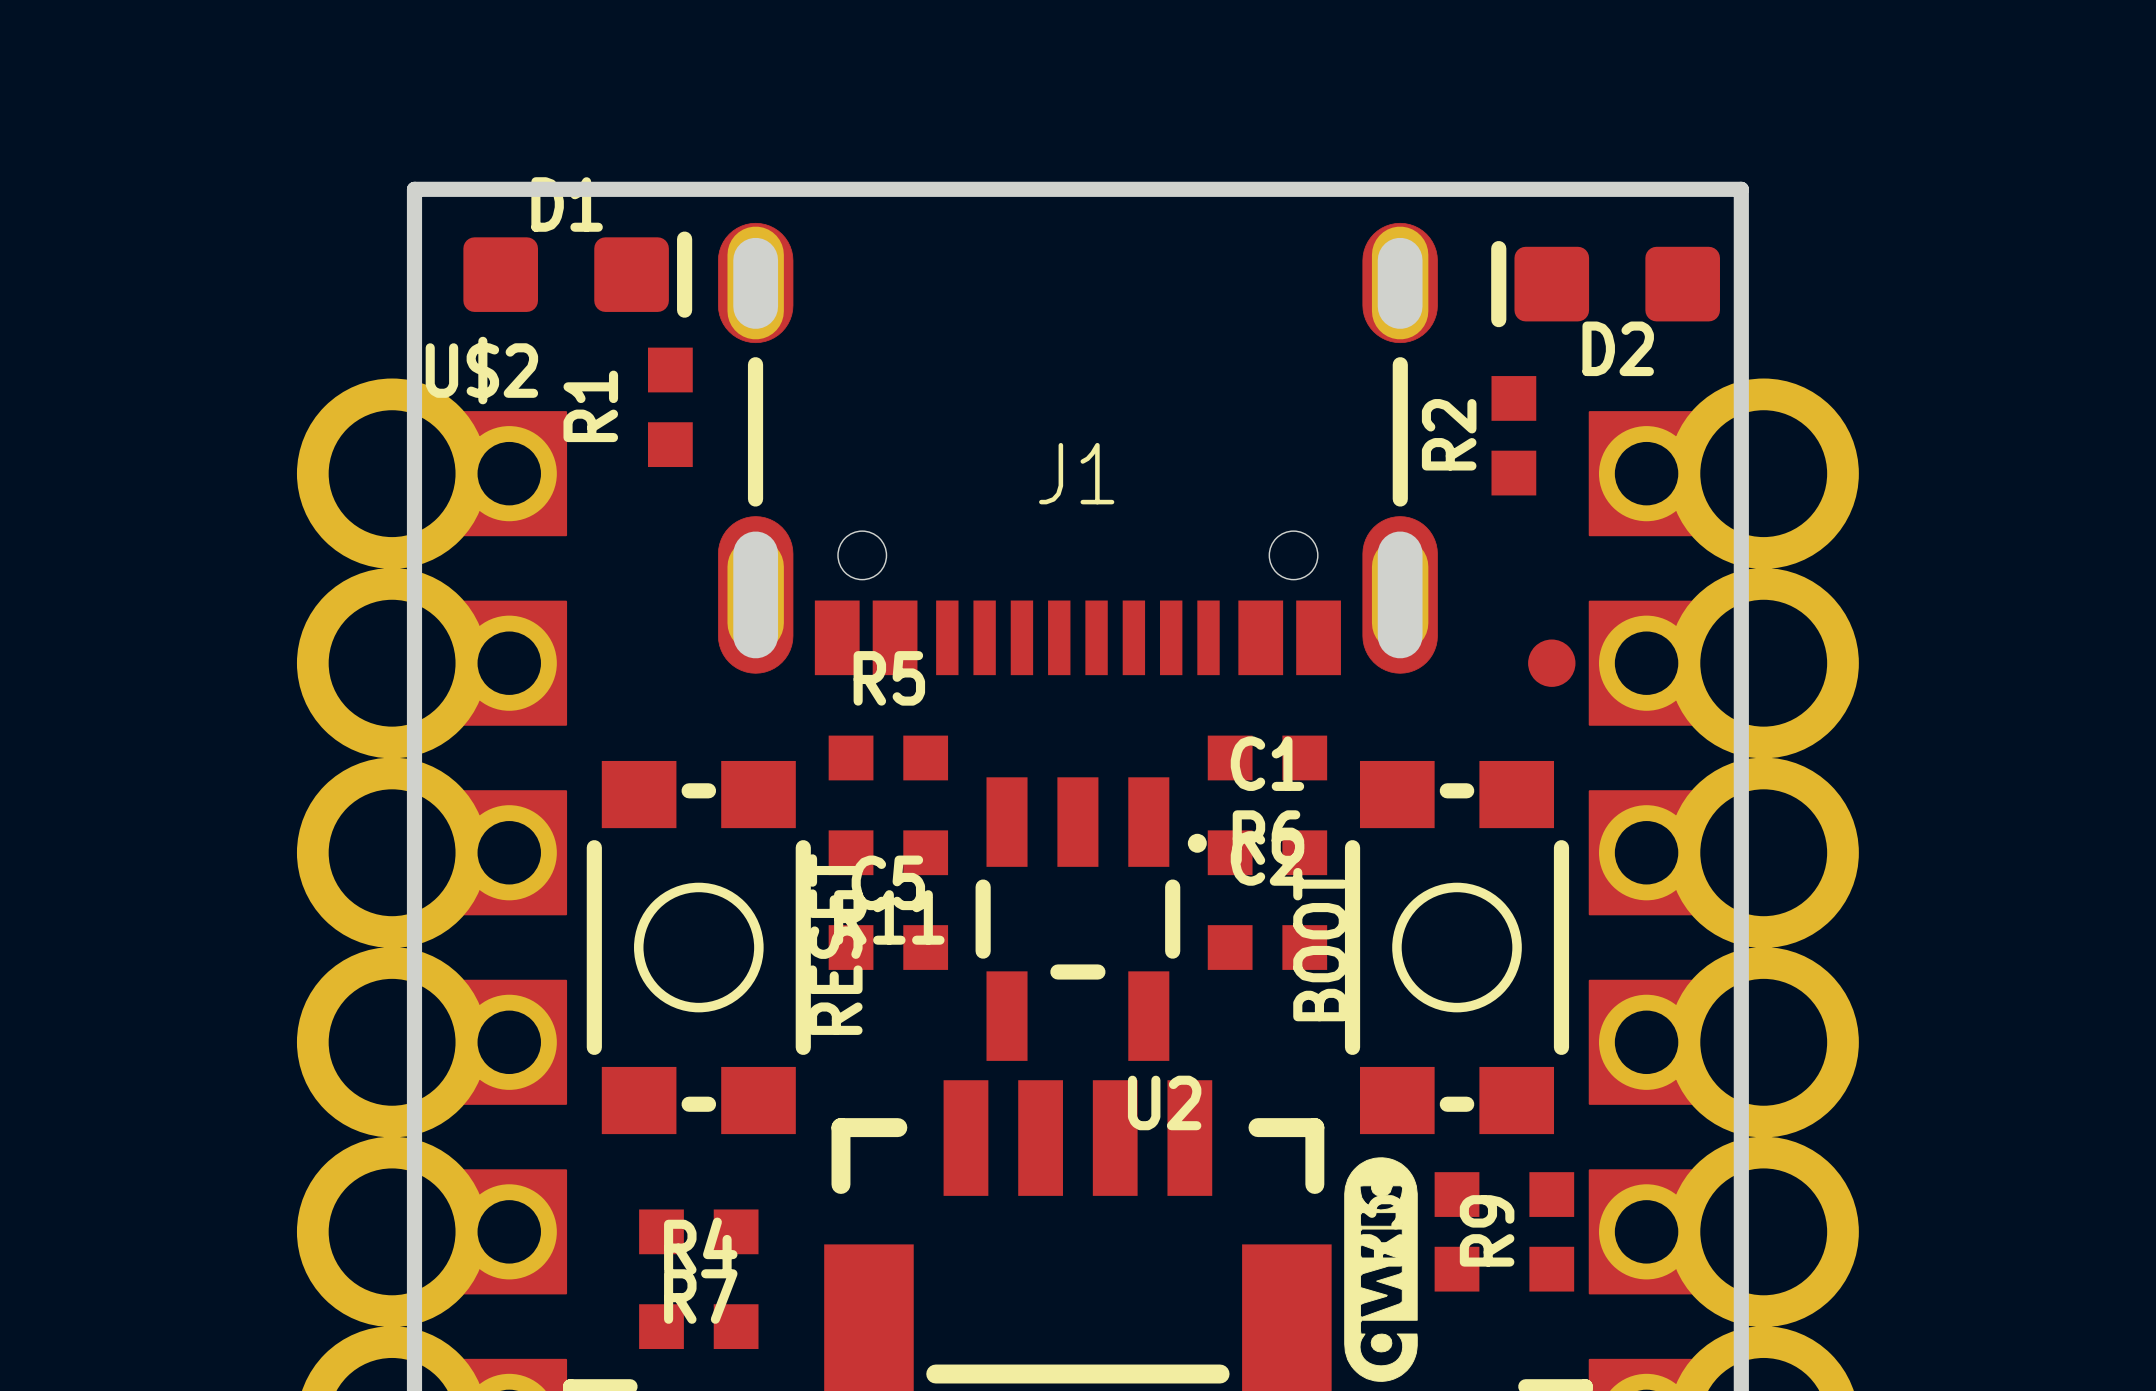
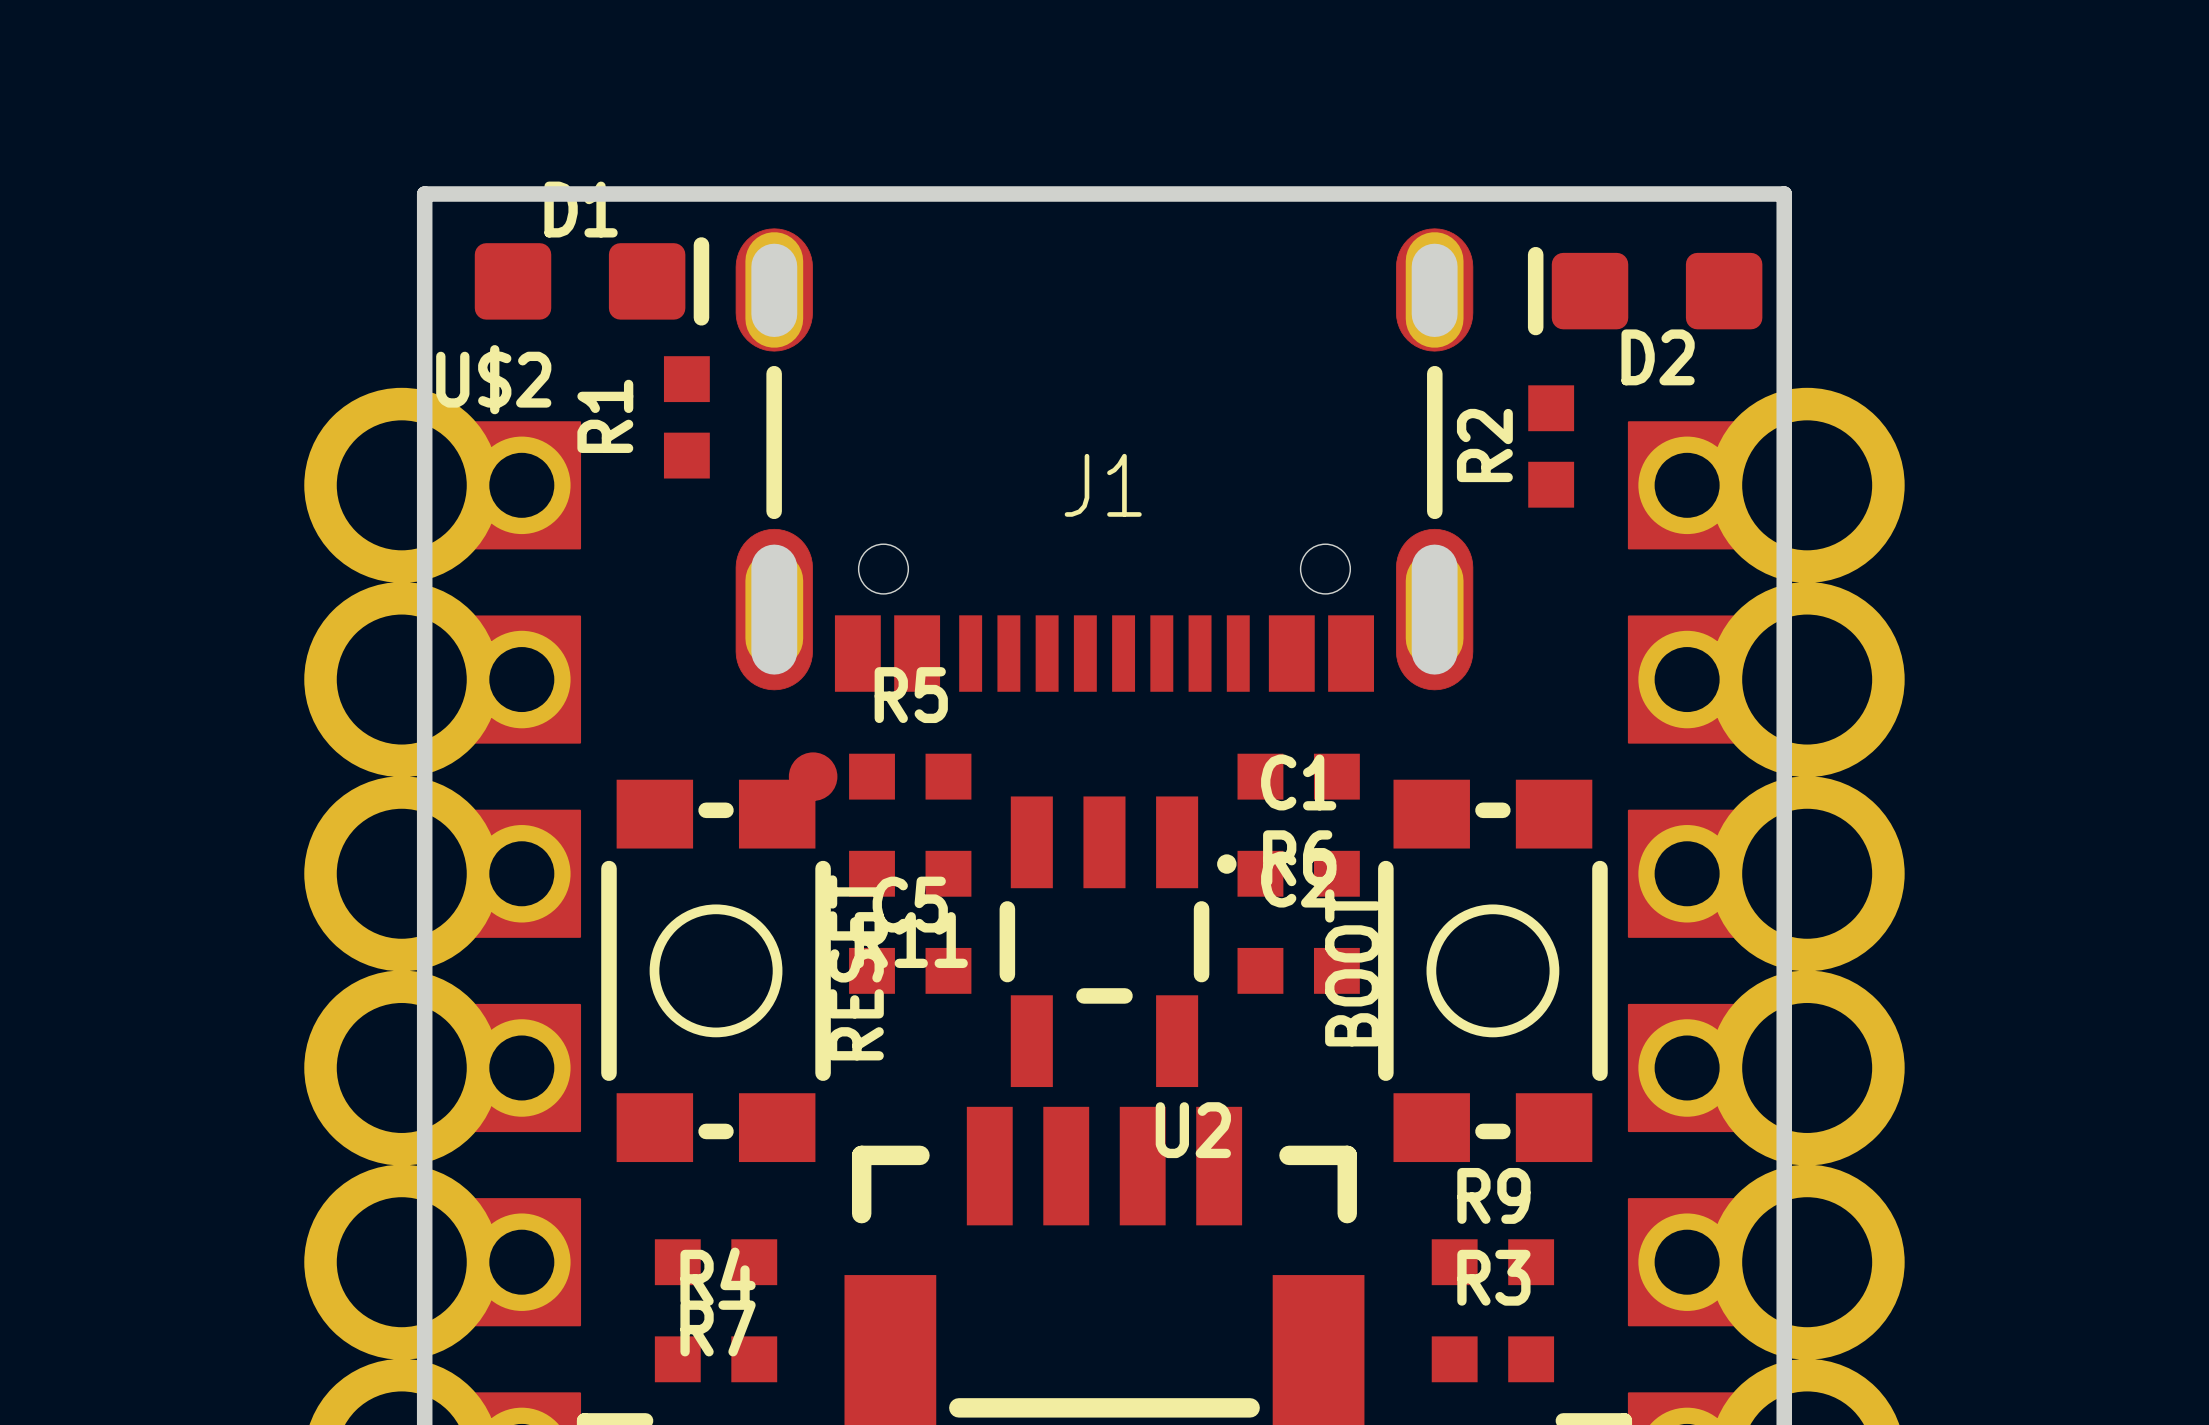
part position: (1551, 663) -> (813, 776)
drawing: [1344, 1157, 1418, 1382] -> none
R3 rotation: 0° (1457, 1231) -> 90° clockwise (1492, 1359)
R3 position: (1457, 1231) -> (1492, 1359)
R9 rotation: 0° (1551, 1231) -> 90° clockwise (1492, 1262)
R9 position: (1551, 1231) -> (1492, 1262)

